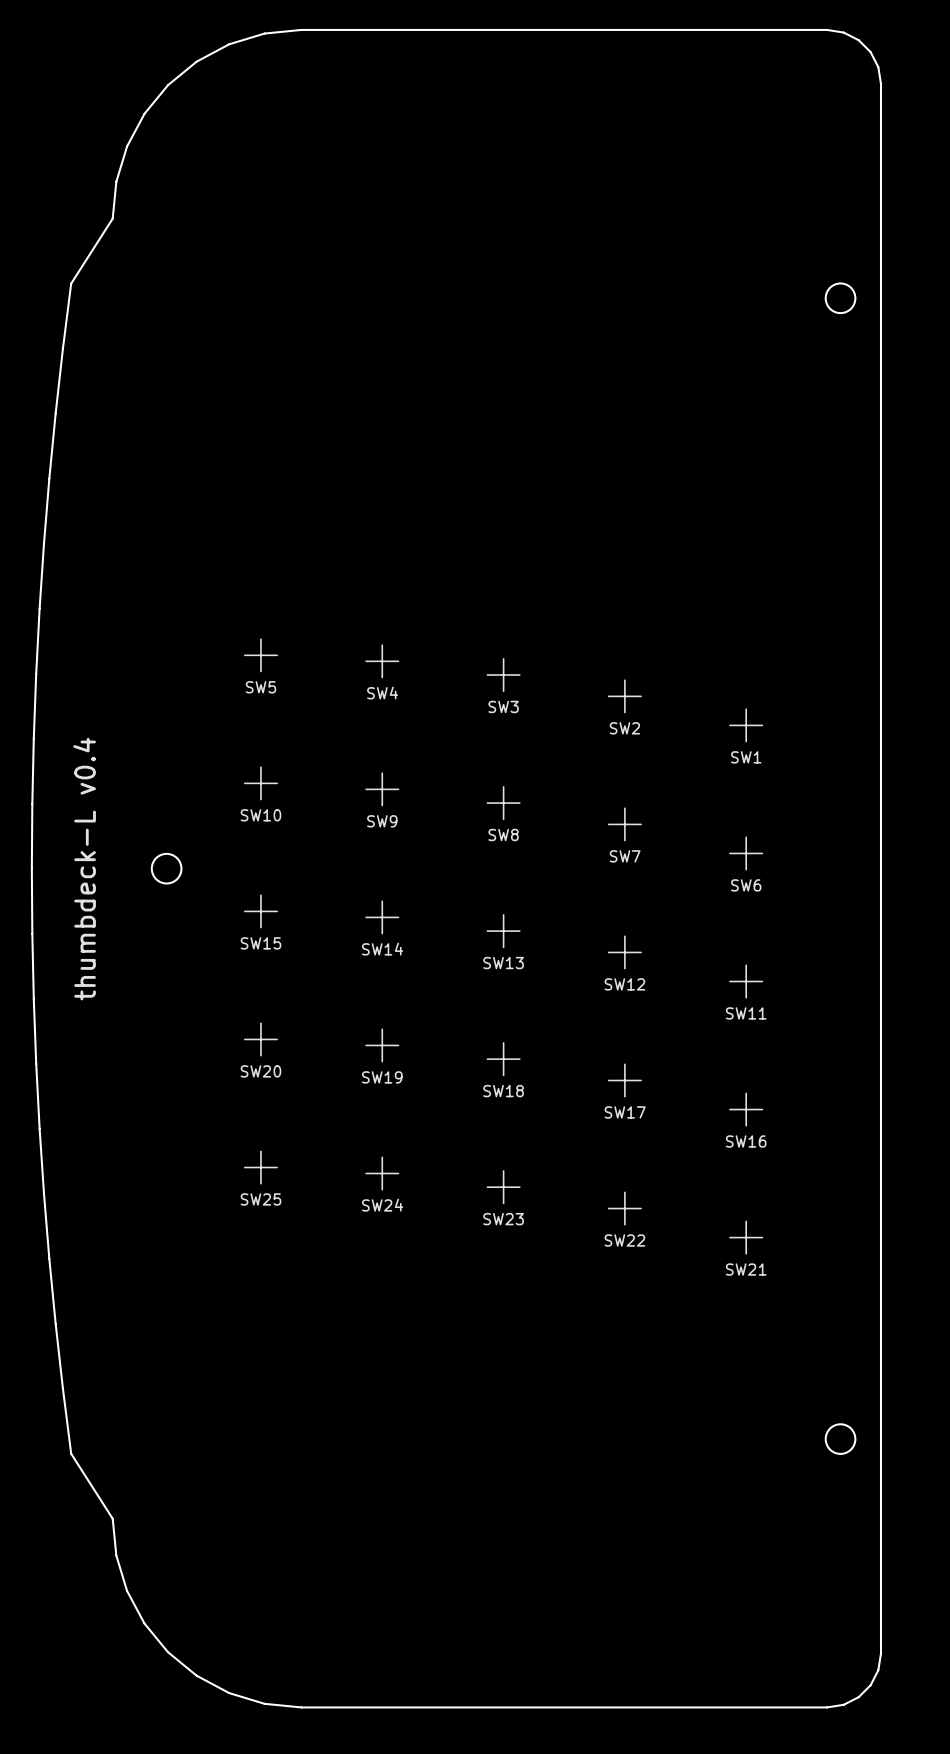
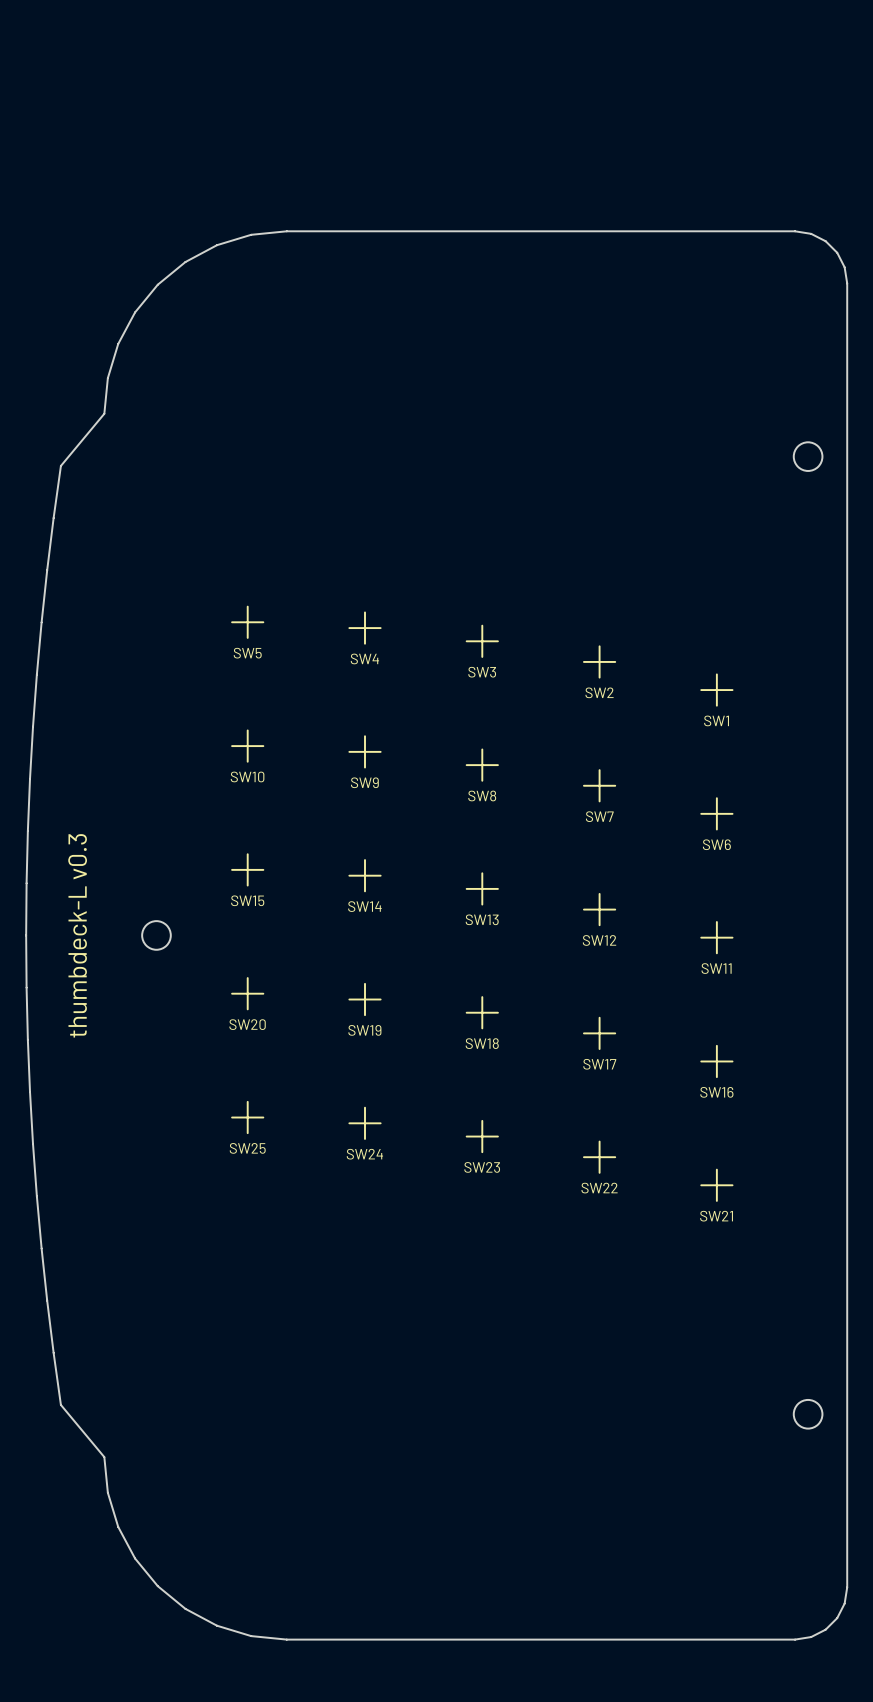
round board edge position: (840, 298) -> (808, 456)
board edge: (880, 304) (880, 83) (878, 67) (870, 52) (858, 40) (843, 32) (827, 29) (301, 29) (264, 33) (229, 44) (196, 61) (167, 85) (144, 113) (127, 146) (116, 181) (112, 218) (71, 283) (49, 478) (39, 608) (33, 738) (32, 933) (36, 1063) (43, 1193) (55, 1323) (71, 1453) (112, 1518) -> (847, 283) (844, 267) (837, 252) (825, 241) (811, 233) (795, 231) (286, 231) (251, 234) (216, 245) (185, 262) (157, 284) (135, 312) (118, 343) (107, 378) (104, 413) (60, 465) (47, 570) (36, 674) (27, 831) (26, 935) (30, 1091) (36, 1196) (47, 1300) (60, 1404) (104, 1457)
round board edge position: (166, 868) -> (156, 935)
text: thumbdeck-L v0.4 (84, 869) -> thumbdeck-L v0.3 (77, 935)
round board edge position: (840, 1439) -> (808, 1414)

